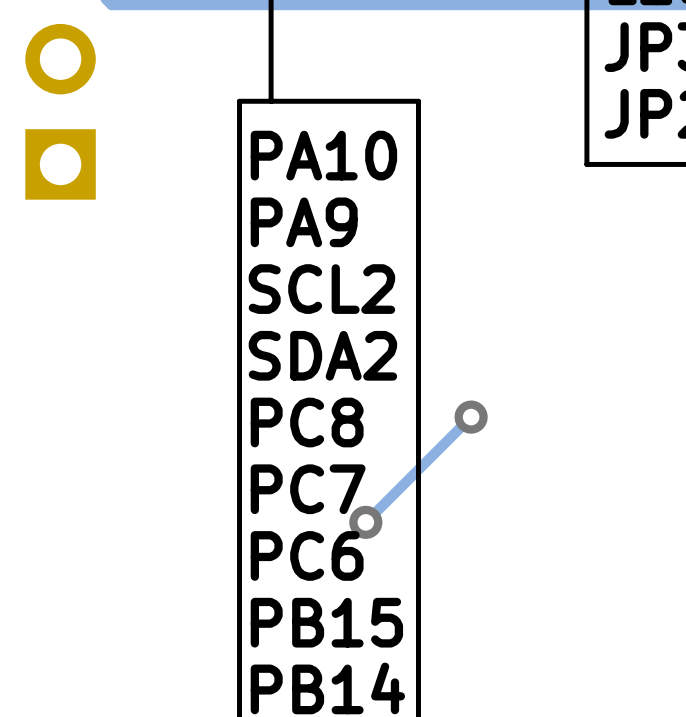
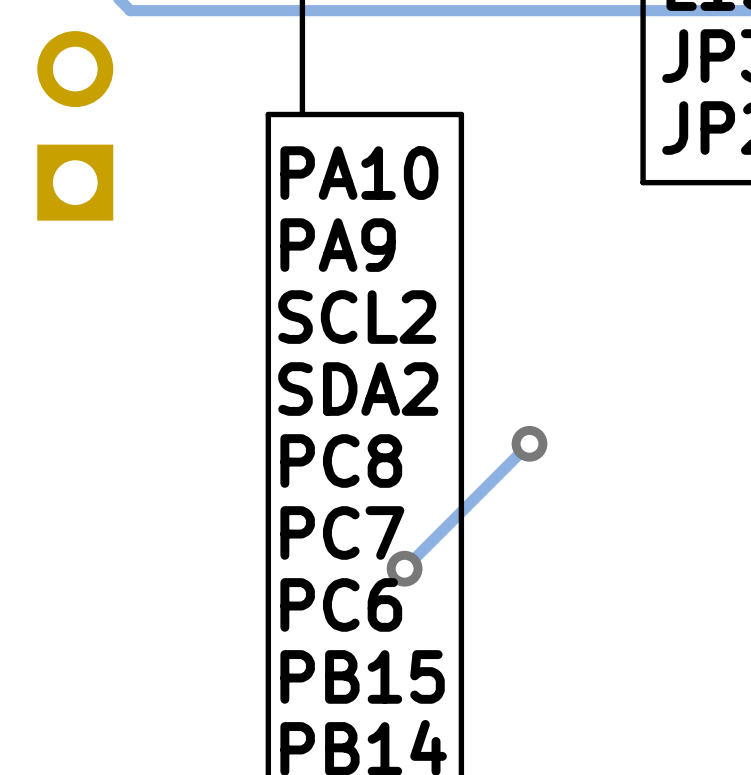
via position: (471, 417) -> (529, 443)

